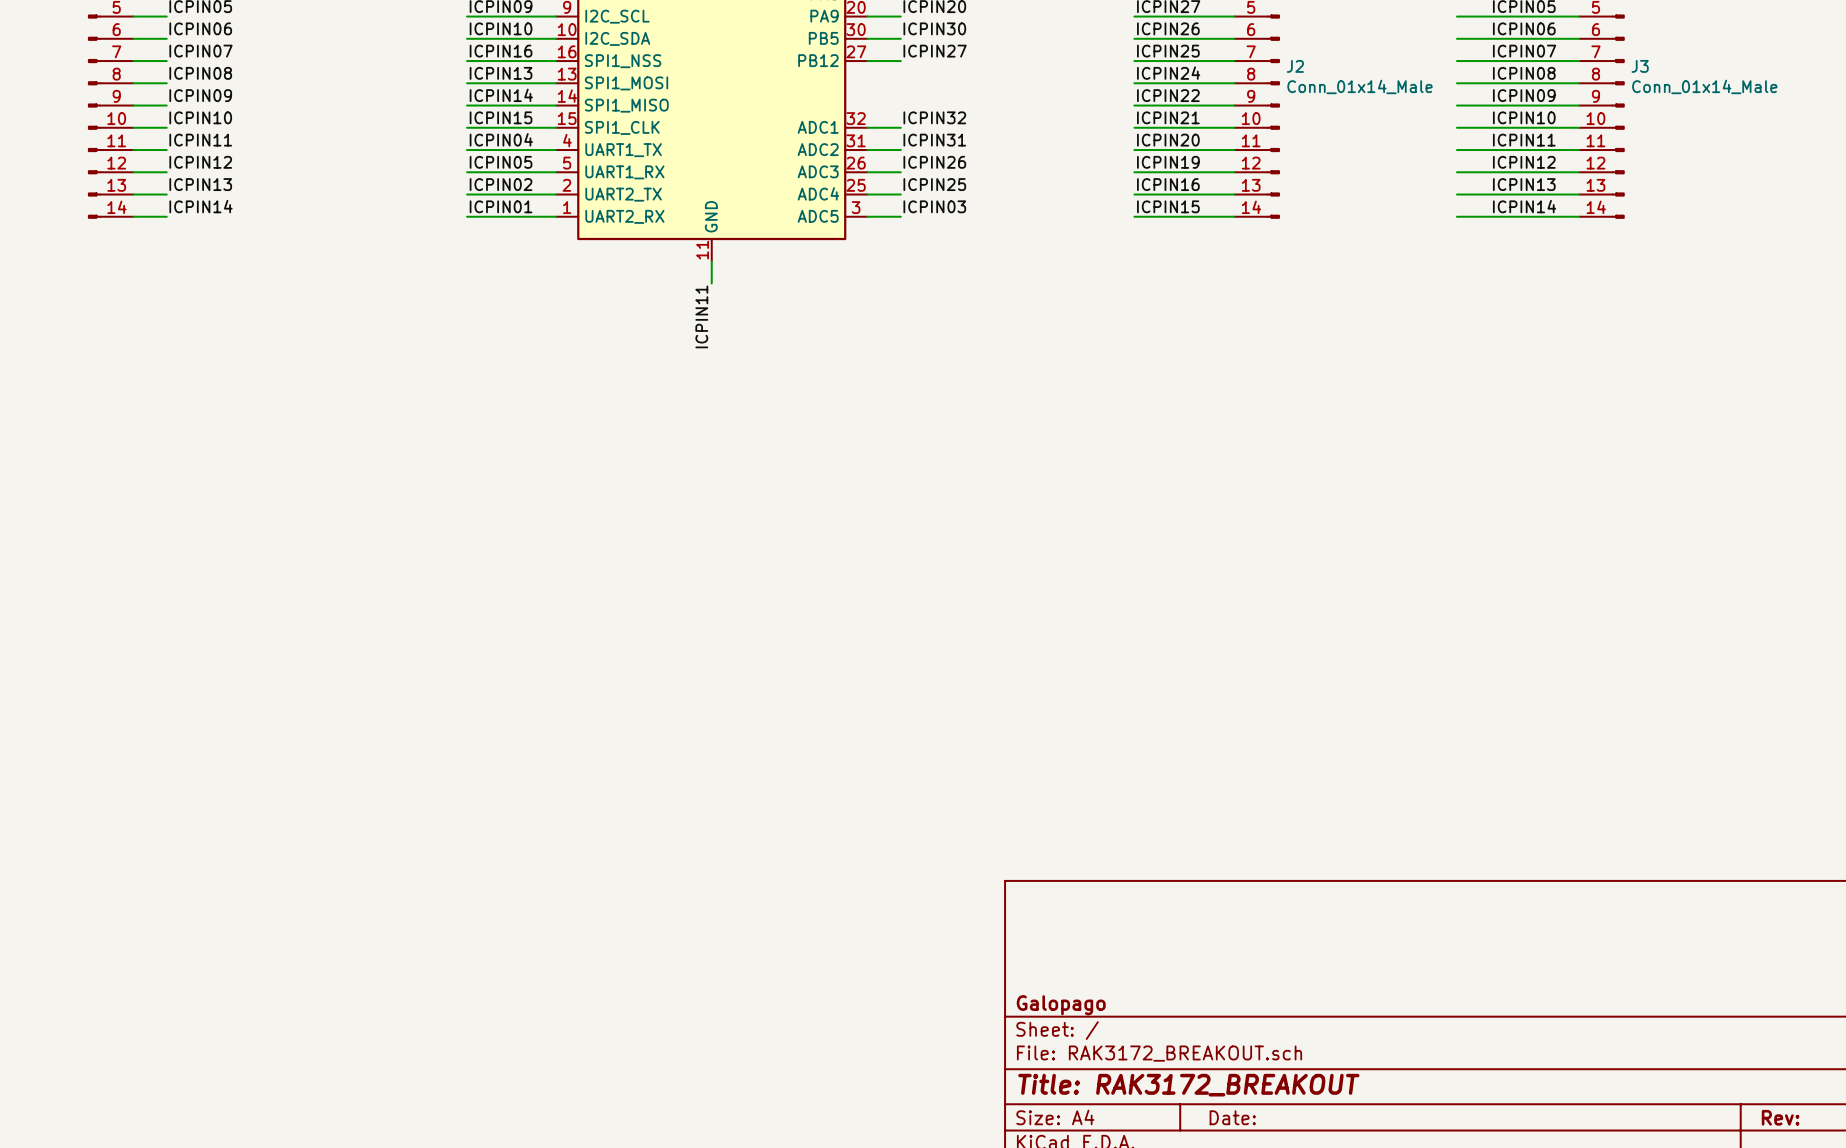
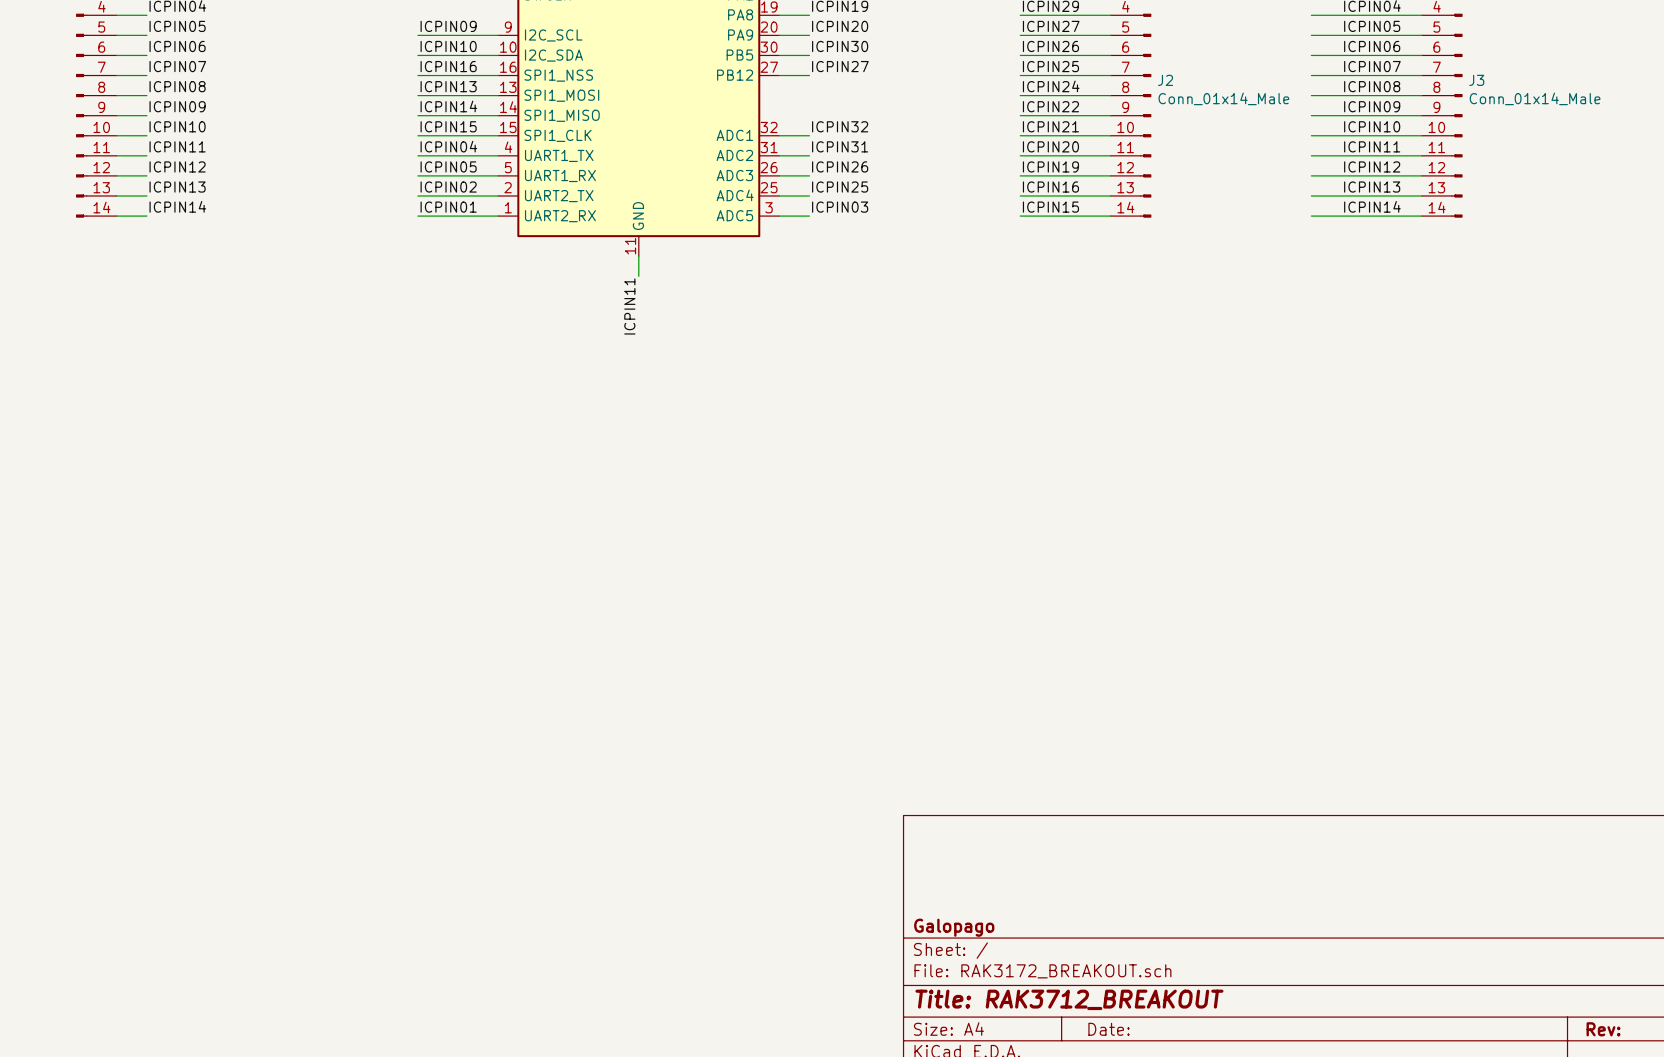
title block: Title: RAK3172_BREAKOUT (1188, 1085) -> Title: RAK3712_BREAKOUT (1069, 999)

